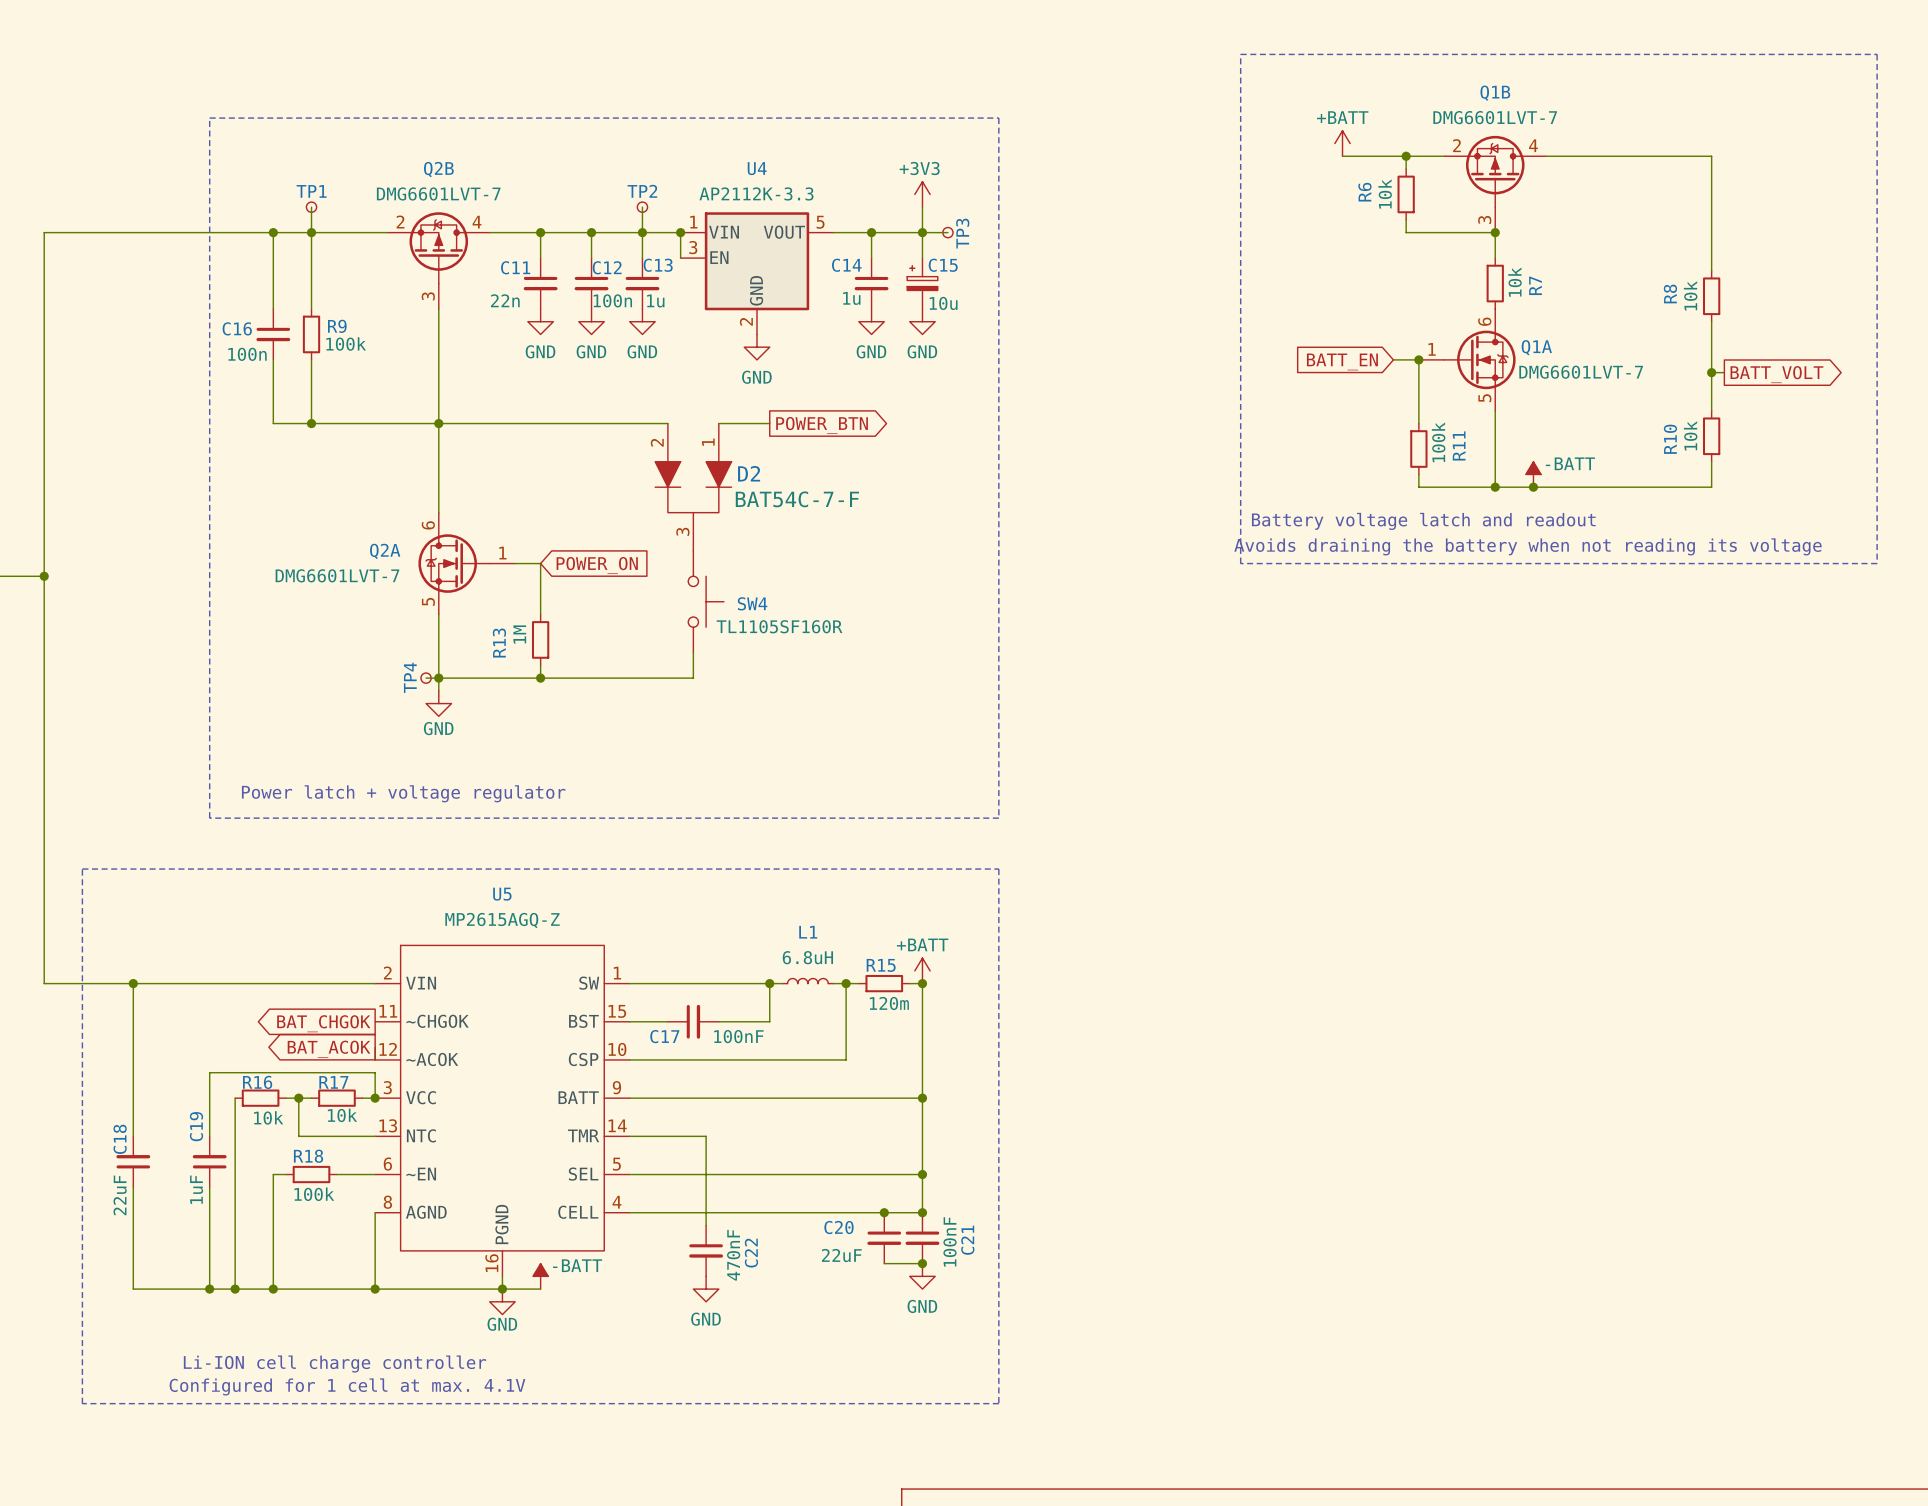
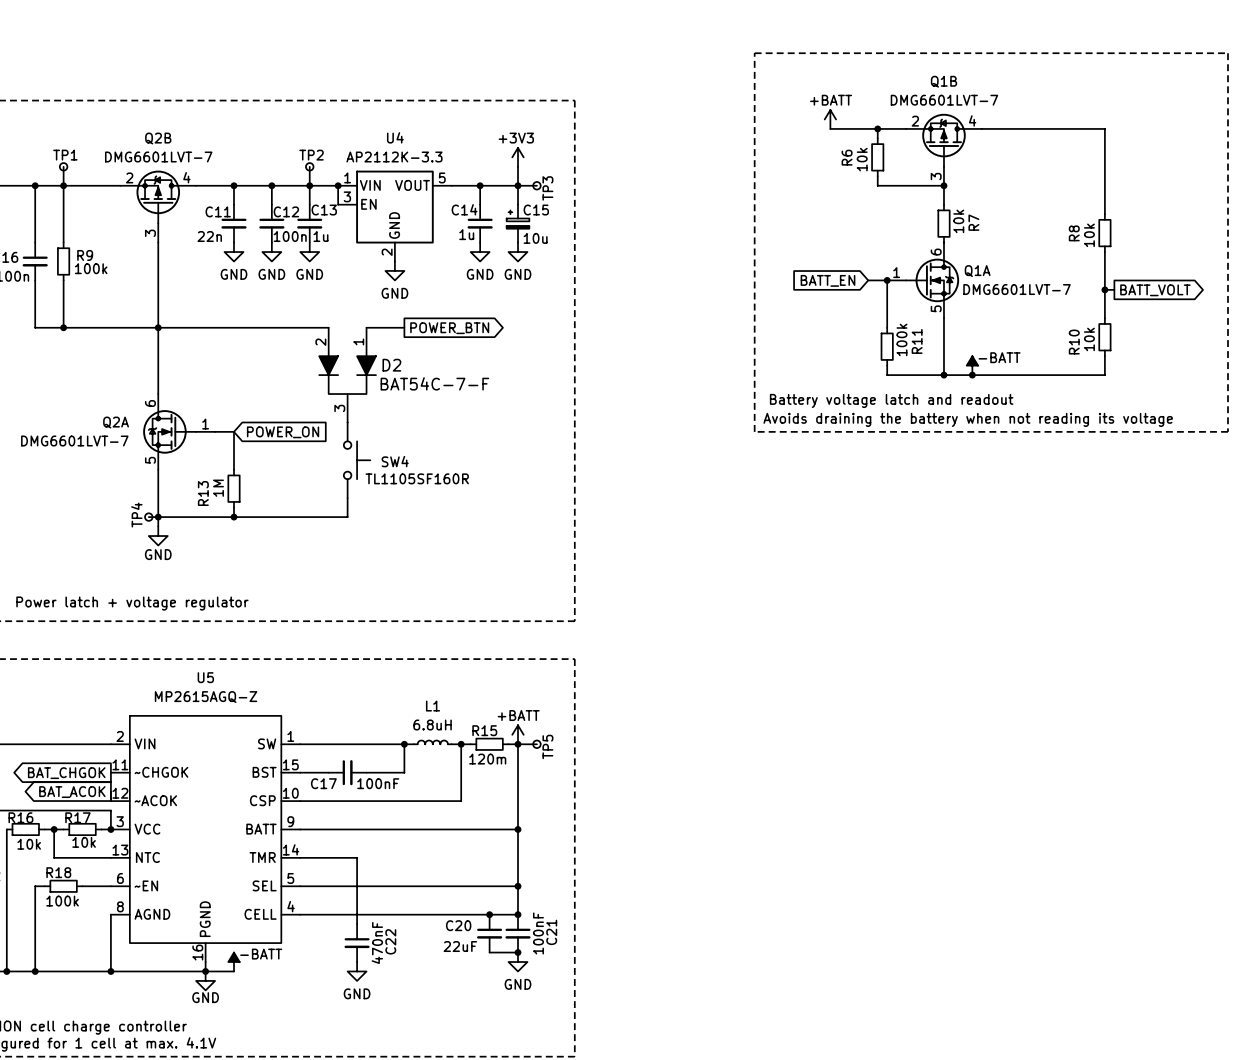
wire: none -> (518, 744) (536, 744)
TP5: none -> (536, 744)

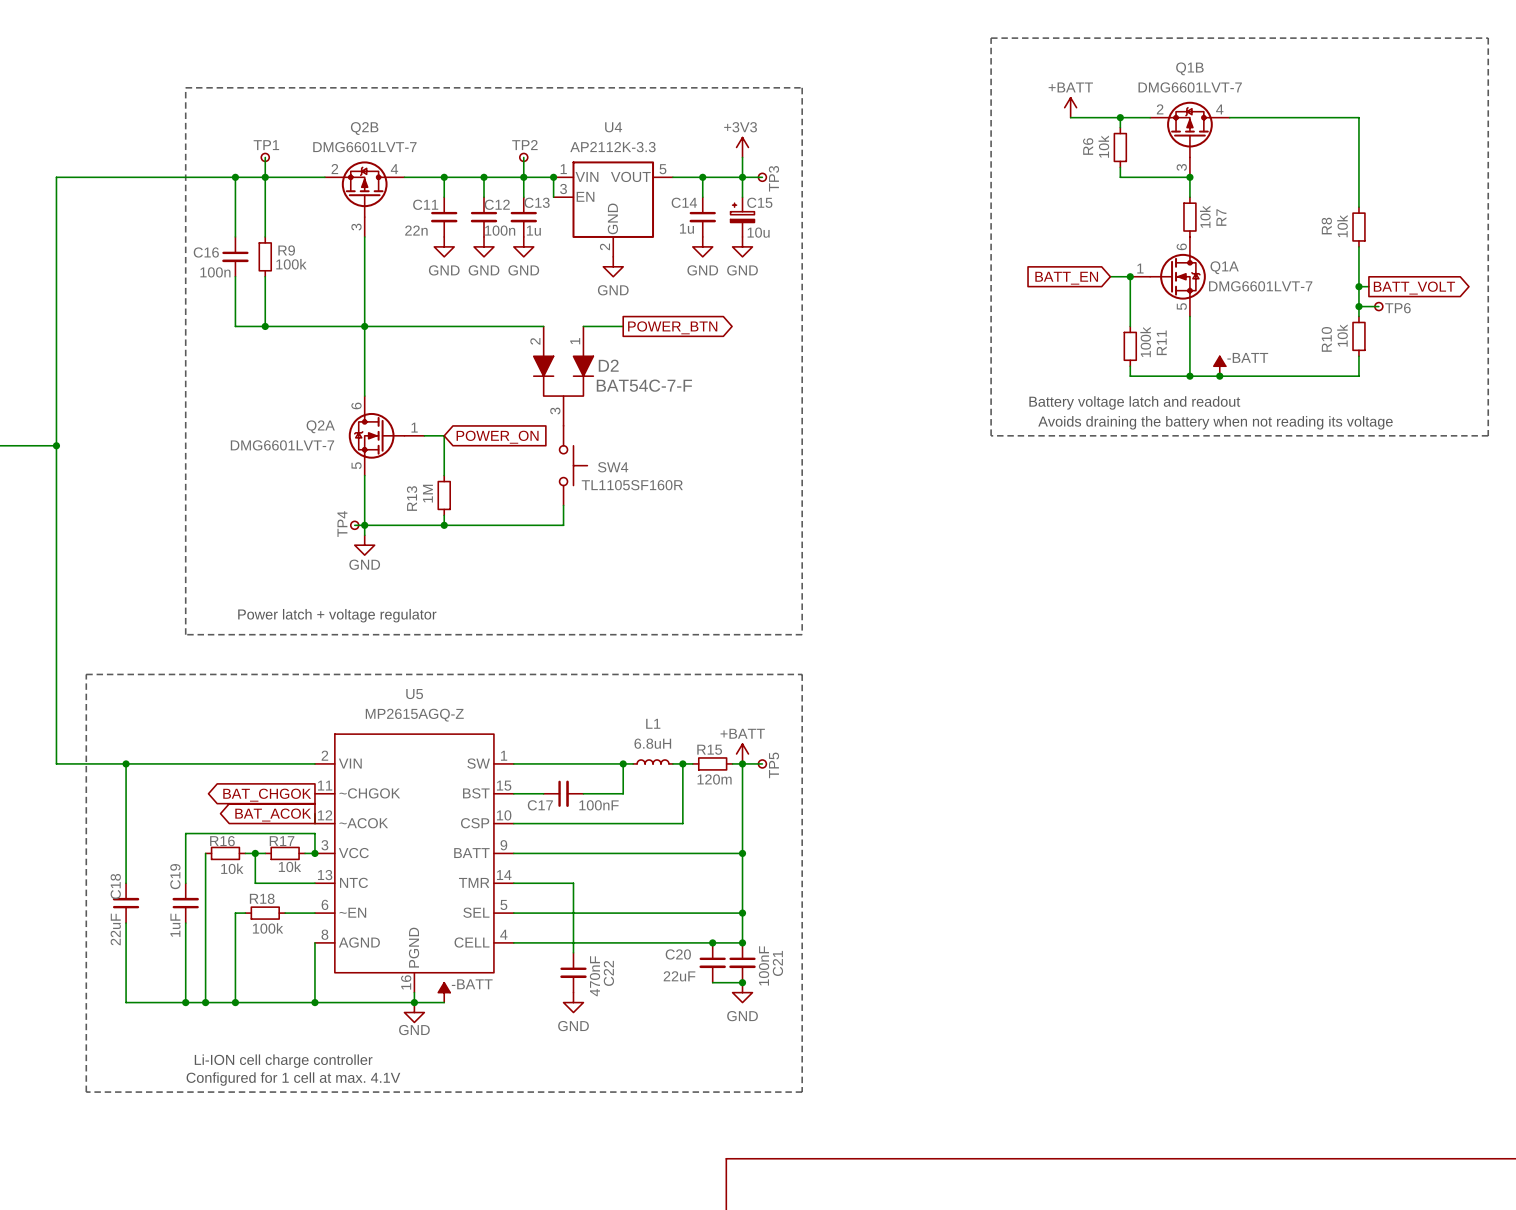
wire: none -> (1358, 306) (1378, 306)
junction: none -> (1358, 306)
TP6: none -> (1378, 306)

